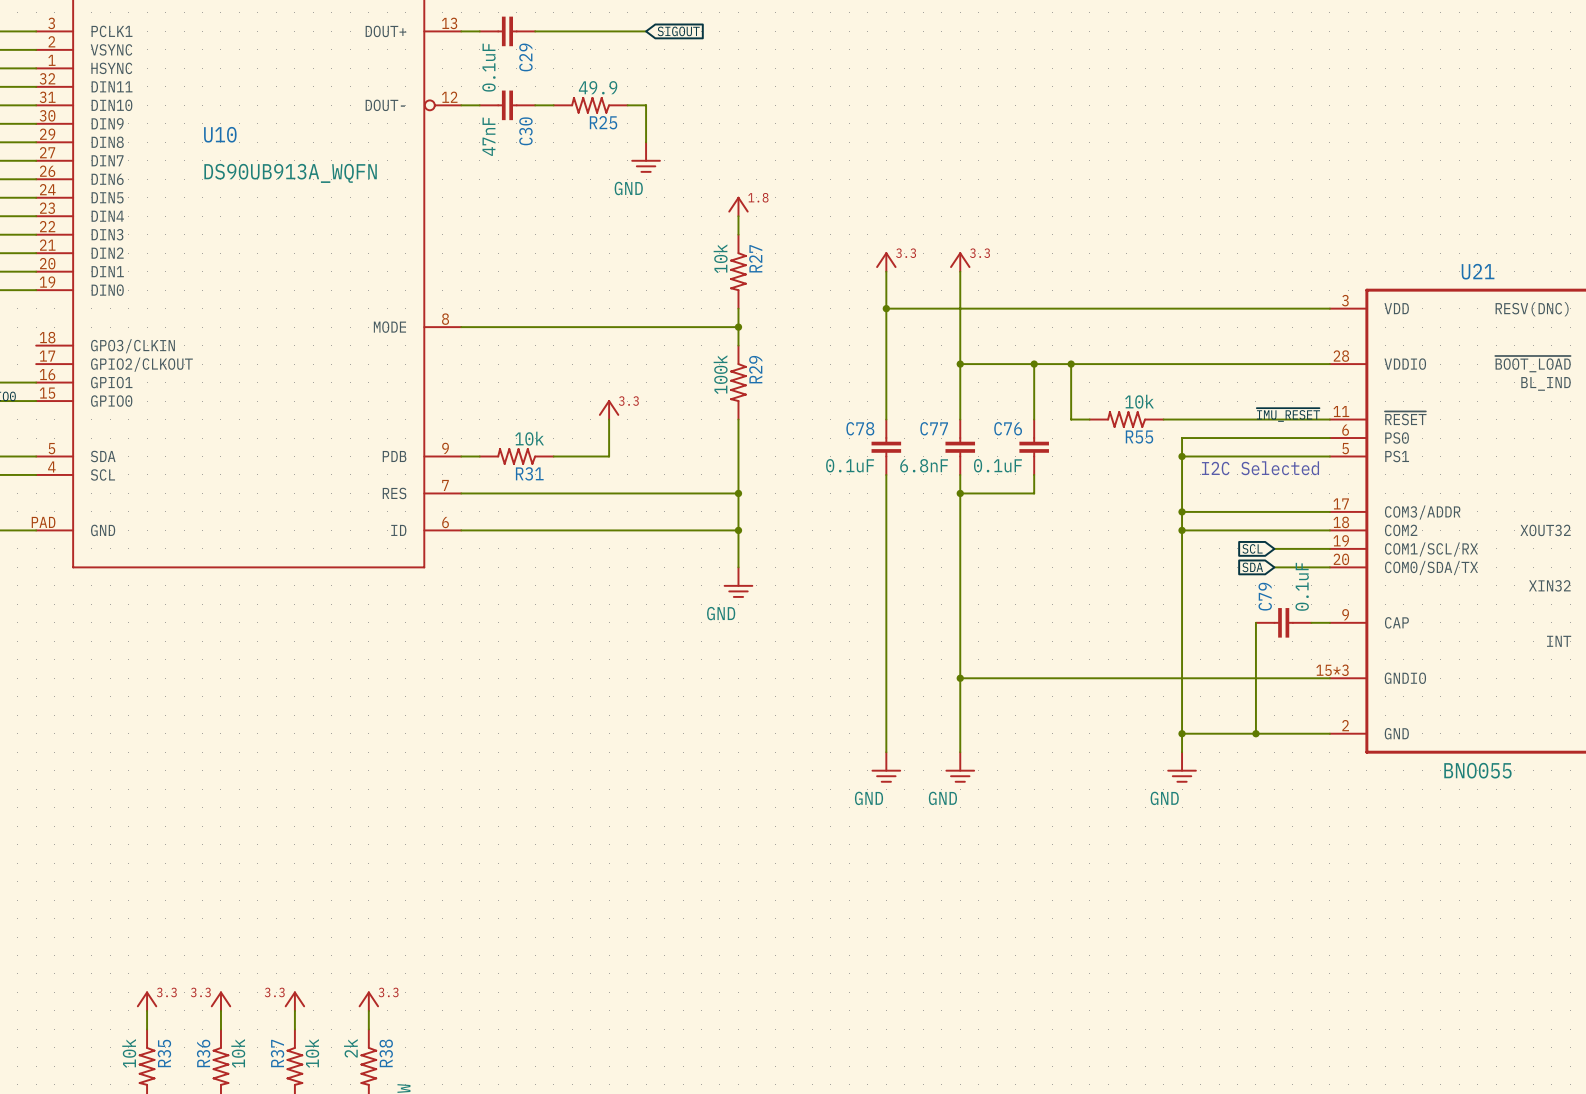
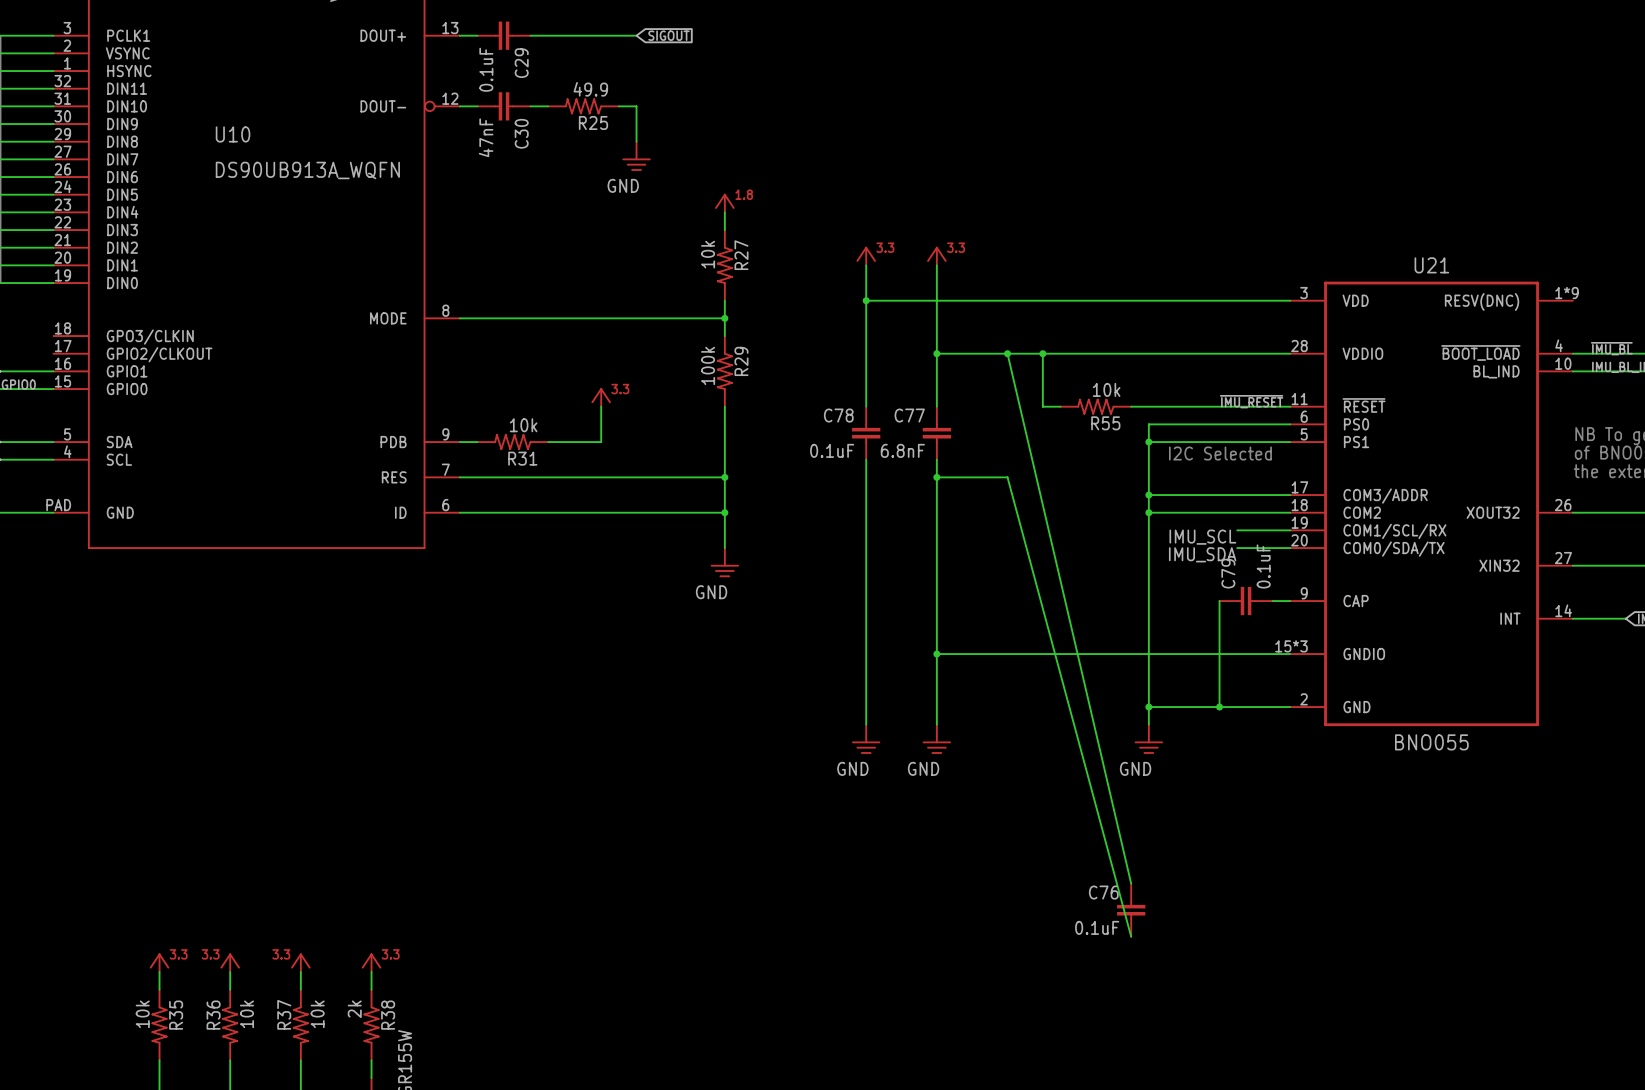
wire: (1034, 364) (1034, 419) -> (1007, 353) (1131, 883)
C76 position: (1034, 447) -> (1131, 910)
wire: (1034, 474) (1034, 493) -> (1131, 936) (1007, 477)
global label: SCL (1252, 548) -> none
label: none -> IMU_SCL (1202, 537)
global label: SDA (1252, 567) -> none
label: none -> IMU_SDA (1202, 554)

